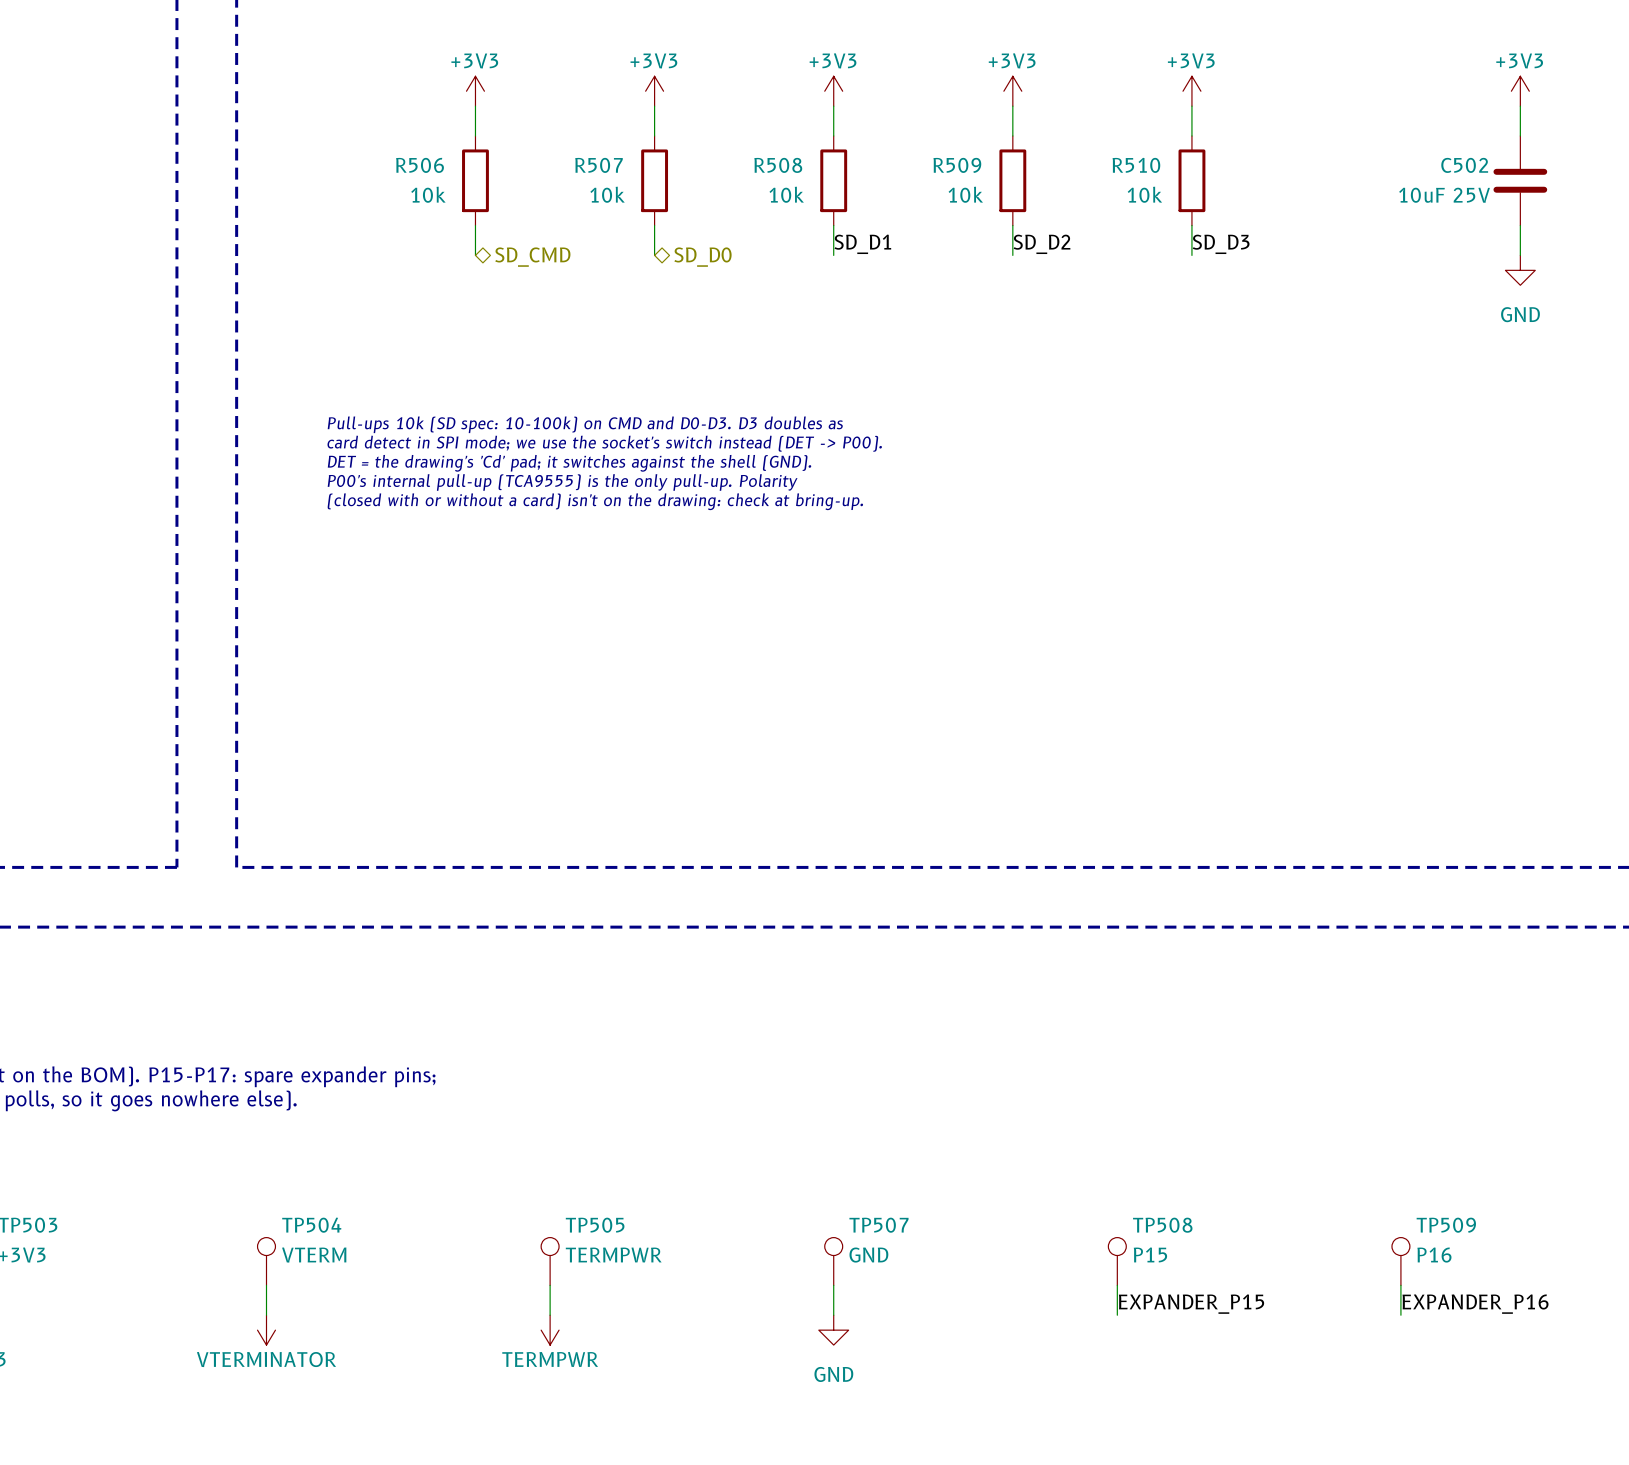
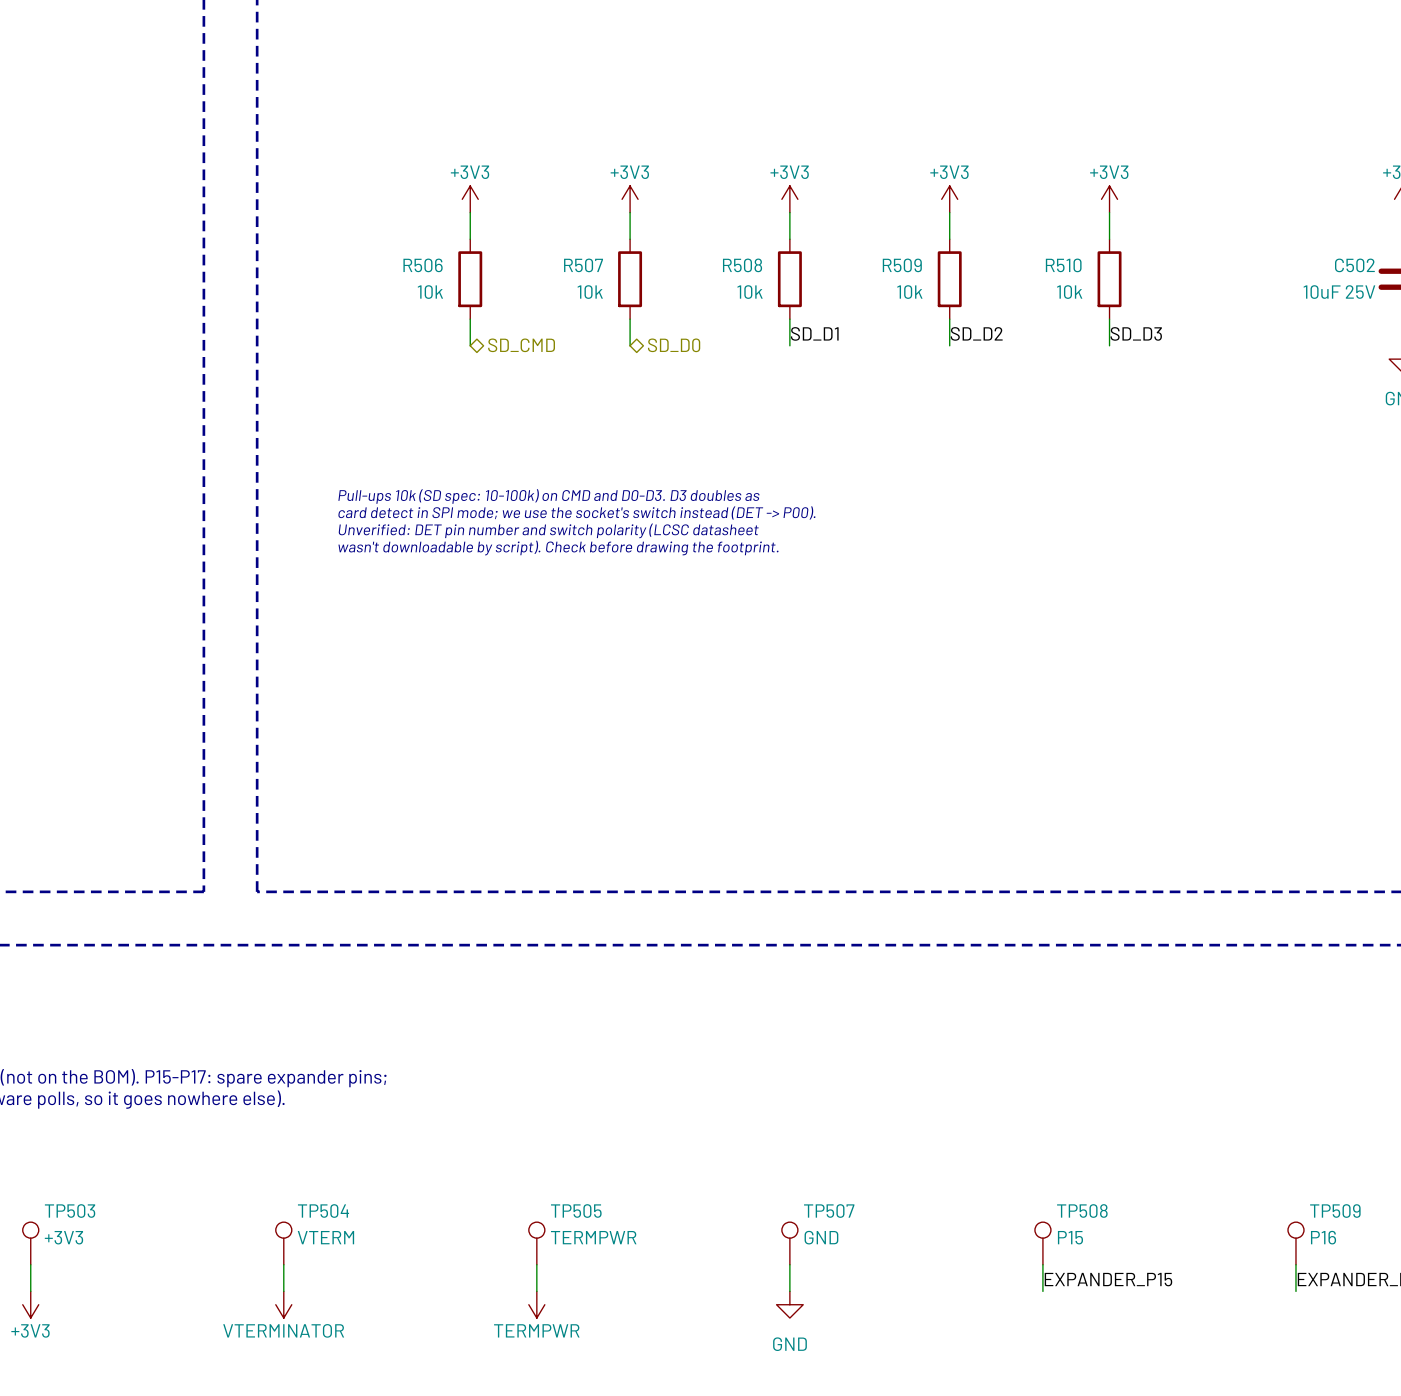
text: DET = the drawing's 'Cd' pad; it switches against the shell (GND). (569, 463) -> Unverified: DET pin number and switch polarity (LCSC datasheet (548, 530)
text: P00's internal pull-up (TCA9555) is the only pull-up. Polarity (562, 482) -> wasn't downloadable by script). Check before drawing the footprint. (558, 548)
text: (closed with or without a card) isn't on the drawing: check at bring-up. (595, 501) -> none

